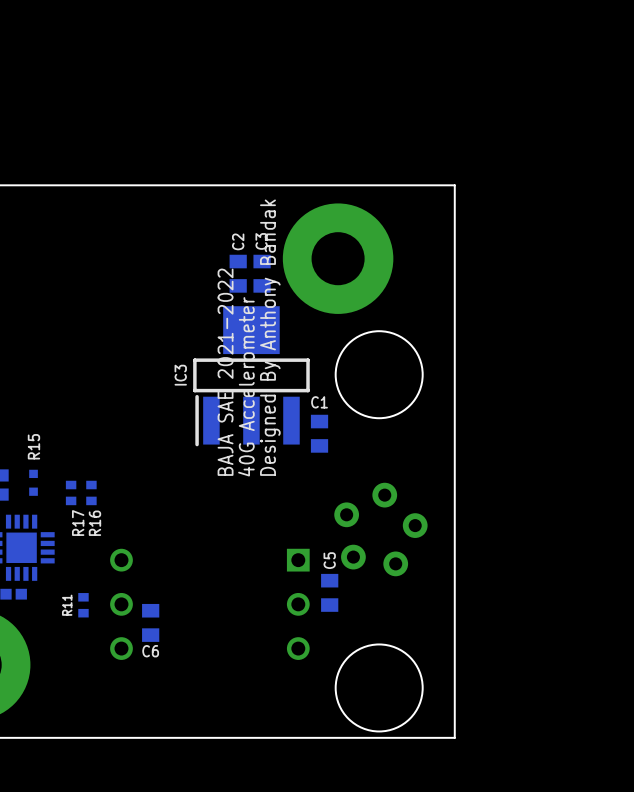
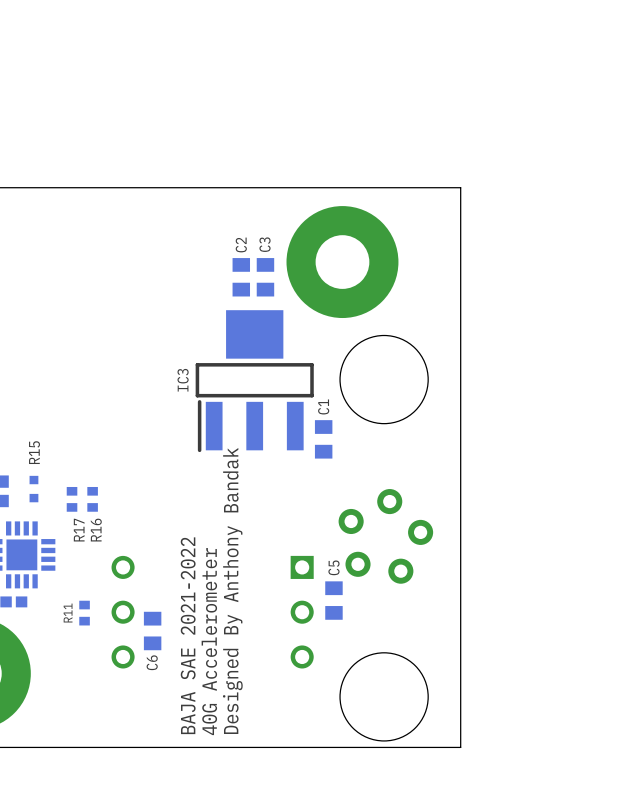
text position: Designed By Anthony Bandak (270, 337) -> Designed By Anthony Bandak (232, 590)
text position: BAJA SAE 2021-2022 (225, 372) -> BAJA SAE 2021-2022 (188, 635)
text position: 40G Accelerometer (246, 386) -> 40G Accelerometer (209, 641)
C1 name rotation: 0° (319, 402) -> 90° counterclockwise (323, 406)
C6 name rotation: 0° (150, 651) -> 90° counterclockwise (152, 662)

